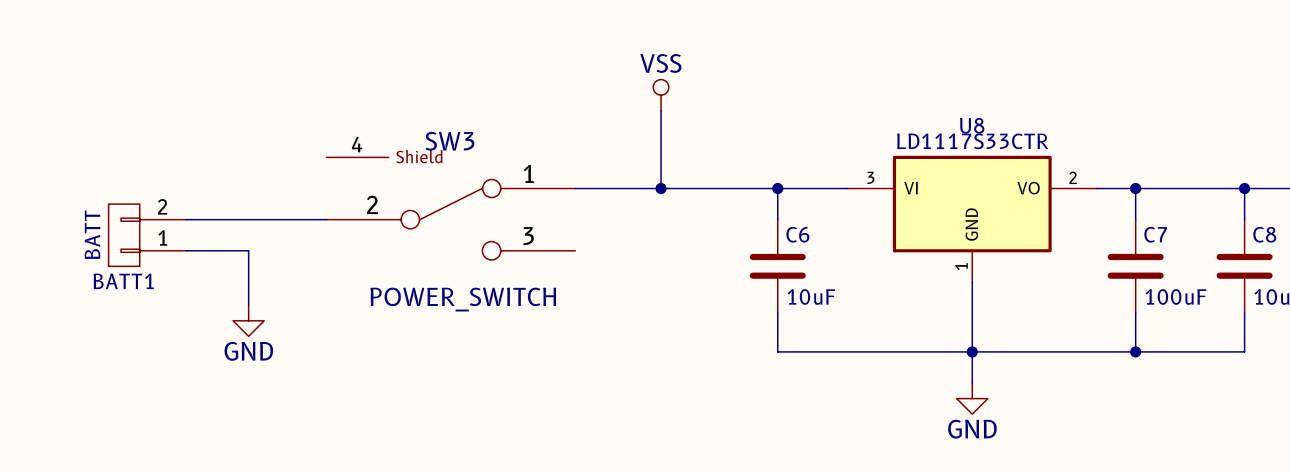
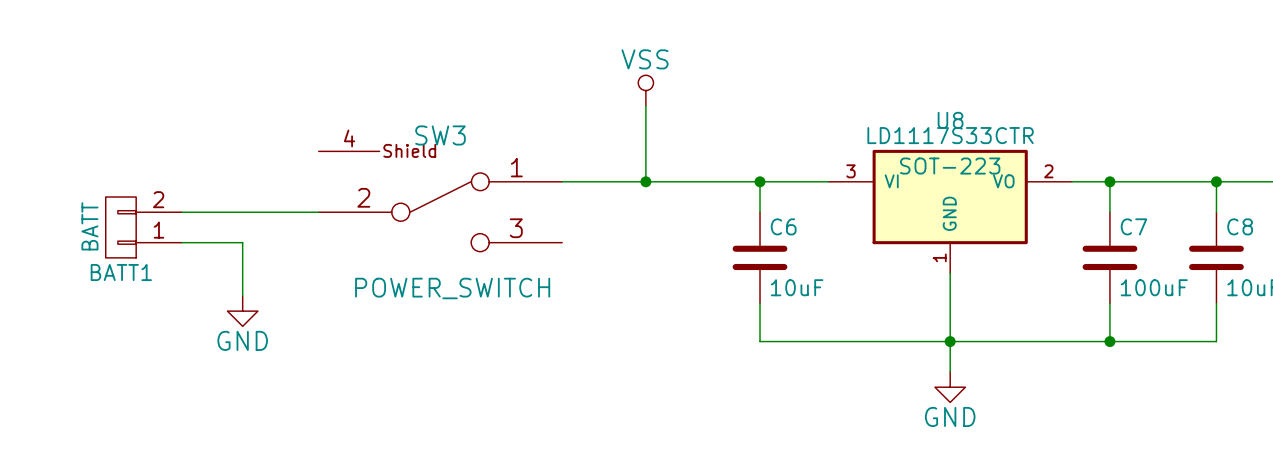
U8 text: none -> SOT-223 (950, 166)

